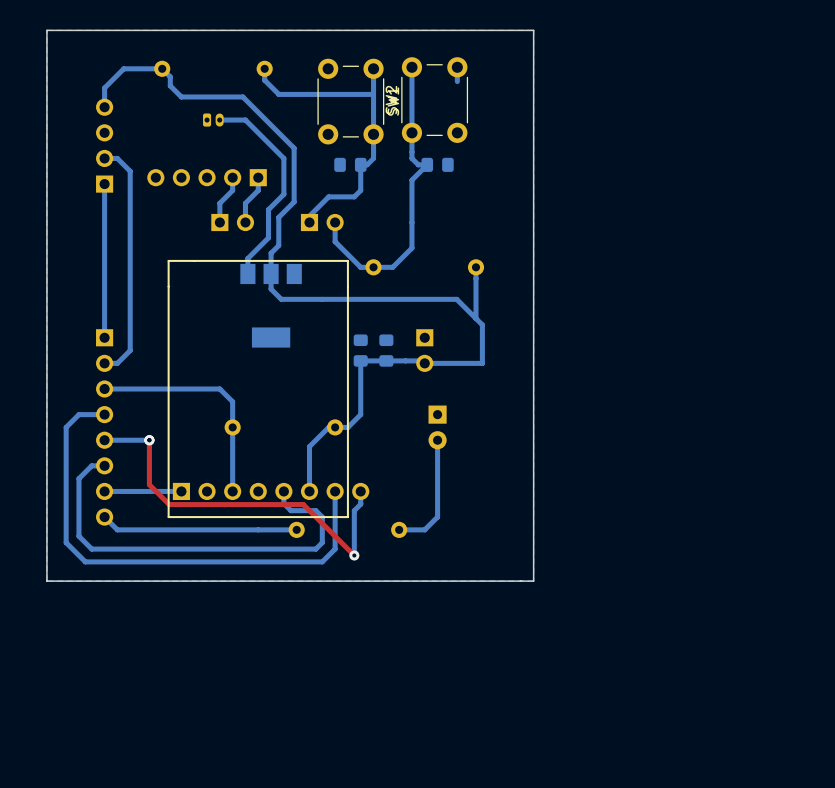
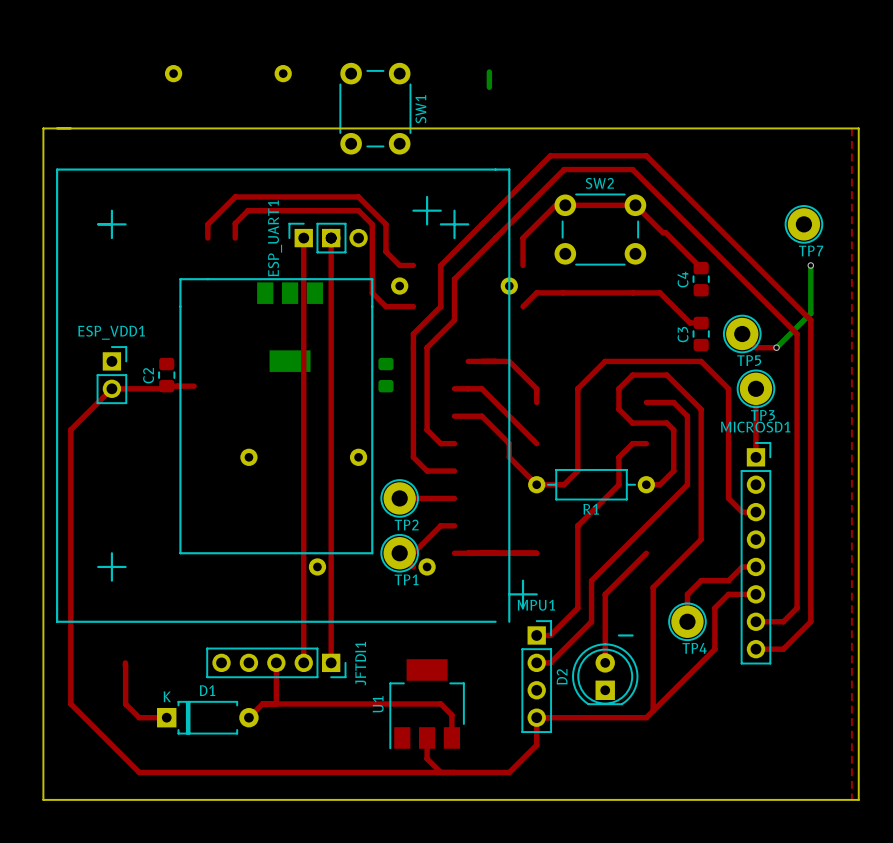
board edge: (46, 30) (533, 30) (533, 581) (46, 581) (46, 30) -> none
bottom track: (411, 67) (411, 158) (418, 164) (427, 164) (411, 180) (411, 248) (392, 267) (360, 267) (335, 241) (335, 222) -> none
bottom track: (264, 68) (264, 80) (278, 94) (373, 94) -> none
bottom track: (373, 68) (373, 158) (367, 164) (360, 164) (360, 190) (354, 196) (328, 196) (309, 216) (309, 222) -> none
SW2 rotation: 0° (434, 100) -> 90° clockwise (600, 229)
SW2 position: (434, 100) -> (600, 229)
bottom track: (104, 107) (104, 88) (123, 68) (162, 68) (170, 76) (170, 85) (181, 96) (242, 96) (294, 148) (294, 202) (278, 217) (278, 245) (271, 253) (271, 289) (281, 299) (456, 299) (482, 324) (482, 363) (360, 360) (360, 414) (347, 427) (328, 427) (309, 446) (309, 491) -> none
board edge: none -> (43, 128) (858, 128) (858, 799) (43, 799) (43, 128)
part: (213, 120) -> none
bottom track: (219, 120) (245, 120) (283, 158) (283, 194) (268, 209) (268, 237) (247, 258) (247, 273) -> none
top zone outline: none -> (851, 128) (851, 799)
part: (104, 145) -> none
bottom track: (104, 158) (117, 158) (130, 171) (130, 350) (117, 363) (104, 363) -> none
part: (350, 164) -> none
C4 side: bottom (437, 164) -> top (701, 279)
part: (207, 177) -> none
bottom track: (232, 177) (232, 190) (219, 203) (219, 222) -> none
bottom track: (258, 177) (258, 190) (245, 203) (245, 222) -> none
bottom track: (104, 184) (104, 337) -> none
line: none -> (427, 196) (427, 224)
top track: none -> (635, 205) (701, 268)
top track: none -> (638, 205) (555, 205) (523, 238) (523, 265)
line: none -> (111, 210) (111, 238)
line: none -> (413, 210) (440, 210)
line: none -> (454, 210) (454, 238)
line: none -> (98, 224) (125, 224)
line: none -> (440, 224) (468, 224)
TP7: none -> (803, 224)
top track: none -> (207, 238) (207, 224) (235, 196) (358, 196) (385, 224) (385, 251) (399, 265) (413, 265)
top track: none -> (235, 238) (235, 223) (248, 210) (358, 210) (372, 224) (372, 292) (385, 306) (413, 306)
ESP_UART1 side: bottom (232, 222) -> top (317, 238)
top track: none -> (303, 238) (303, 662)
top track: none -> (331, 238) (331, 662)
bottom track: none -> (810, 265) (810, 313) (776, 347)
via: none -> (810, 265)
bottom track: (476, 267) (476, 318) -> none
top track: none -> (523, 306) (536, 292) (660, 292) (690, 322) (701, 322) (698, 320)
C3: none -> (701, 333)
top track: none -> (742, 333) (755, 347) (776, 347)
TP5: none -> (742, 333)
via: none -> (776, 347)
top track: none -> (468, 361) (509, 361) (536, 388) (536, 402)
ESP_VDD1: none -> (111, 375)
C2 side: bottom (386, 350) -> top (166, 375)
part: (424, 350) -> none
top track: none -> (194, 386) (166, 386) (164, 388) (111, 388) (70, 429) (70, 703) (139, 772) (509, 772) (536, 745) (536, 717) (646, 717) (714, 649) (714, 608) (728, 594) (755, 594)
top track: none -> (454, 388) (481, 388) (536, 443)
top track: none -> (755, 388) (755, 457)
TP3: none -> (755, 388)
top track: none -> (646, 402) (673, 402) (687, 416) (687, 484) (591, 580) (591, 621) (550, 662) (536, 662)
bottom track: (104, 388) (219, 388) (232, 401) (232, 491) -> none
top track: none -> (454, 416) (481, 416) (509, 443) (509, 457) (536, 484) (564, 484) (577, 471) (577, 388) (605, 361) (701, 361) (728, 388) (728, 498) (742, 512) (755, 512)
bottom track: (104, 414) (78, 414) (66, 427) (66, 542) (85, 561) (322, 561) (335, 549) (335, 491) -> none
top track: none -> (454, 443) (440, 443) (427, 429) (427, 347) (454, 320) (454, 279) (564, 169) (632, 169) (797, 333) (797, 608) (783, 621) (755, 621)
top track: none -> (646, 443) (632, 443) (618, 457) (618, 484) (577, 525) (577, 608) (550, 635) (536, 635)
part: (104, 427) -> none
D2 side: bottom (437, 427) -> top (605, 674)
bottom track: (104, 440) (149, 440) -> none
top track: (149, 440) (149, 484) (169, 504) (303, 504) (354, 555) -> none
via: (149, 440) -> none
top track: none -> (454, 471) (427, 471) (413, 457) (413, 333) (440, 306) (440, 265) (550, 155) (646, 155) (810, 320) (810, 621) (783, 649) (755, 649)
bottom track: (437, 440) (437, 517) (424, 529) (399, 529) -> none
R1: none -> (591, 484)
top track: none -> (646, 484) (660, 484) (673, 471) (673, 429) (666, 423) (632, 423) (618, 409) (618, 388) (632, 375) (666, 375) (701, 409) (701, 539) (653, 587) (653, 710)
bottom track: (104, 465) (91, 465) (78, 478) (78, 536) (91, 549) (315, 549) (322, 542) (322, 517) (315, 510) (290, 510) (283, 503) (283, 491) -> none
top track: none -> (399, 498) (454, 498)
TP2: none -> (399, 498)
bottom track: (104, 491) (181, 491) -> none
part: (271, 491) -> none
bottom track: (360, 491) (360, 504) (354, 510) (354, 555) -> none
top track: none -> (454, 525) (440, 525) (413, 553) (399, 553) (413, 566)
line: none -> (111, 553) (111, 580)
bottom track: (104, 517) (117, 529) (296, 529) -> none
TP1: none -> (399, 553)
top track: none -> (454, 553) (536, 553)
top track: none -> (646, 553) (605, 594) (605, 662)
MICROSD1: none -> (755, 553)
line: none -> (98, 566) (125, 566)
top track: none -> (755, 566) (742, 566) (728, 580) (701, 580) (687, 594) (687, 621)
line: none -> (523, 580) (523, 608)
via: (354, 555) -> none
line: none -> (509, 594) (536, 594)
line: none -> (495, 621) (57, 621) (57, 169) (509, 169) (509, 621)
TP4: none -> (687, 621)
line: none -> (618, 635) (632, 635)
top track: none -> (125, 662) (125, 703) (139, 717) (166, 717)
top track: none -> (276, 662) (276, 703)
JFTDI1: none -> (276, 662)
MPU1: none -> (536, 676)
U1: none -> (427, 704)
D1: none -> (207, 717)
top track: none -> (248, 717) (262, 703) (440, 703) (451, 715) (451, 737)
top track: none -> (427, 737) (427, 758) (440, 772)

